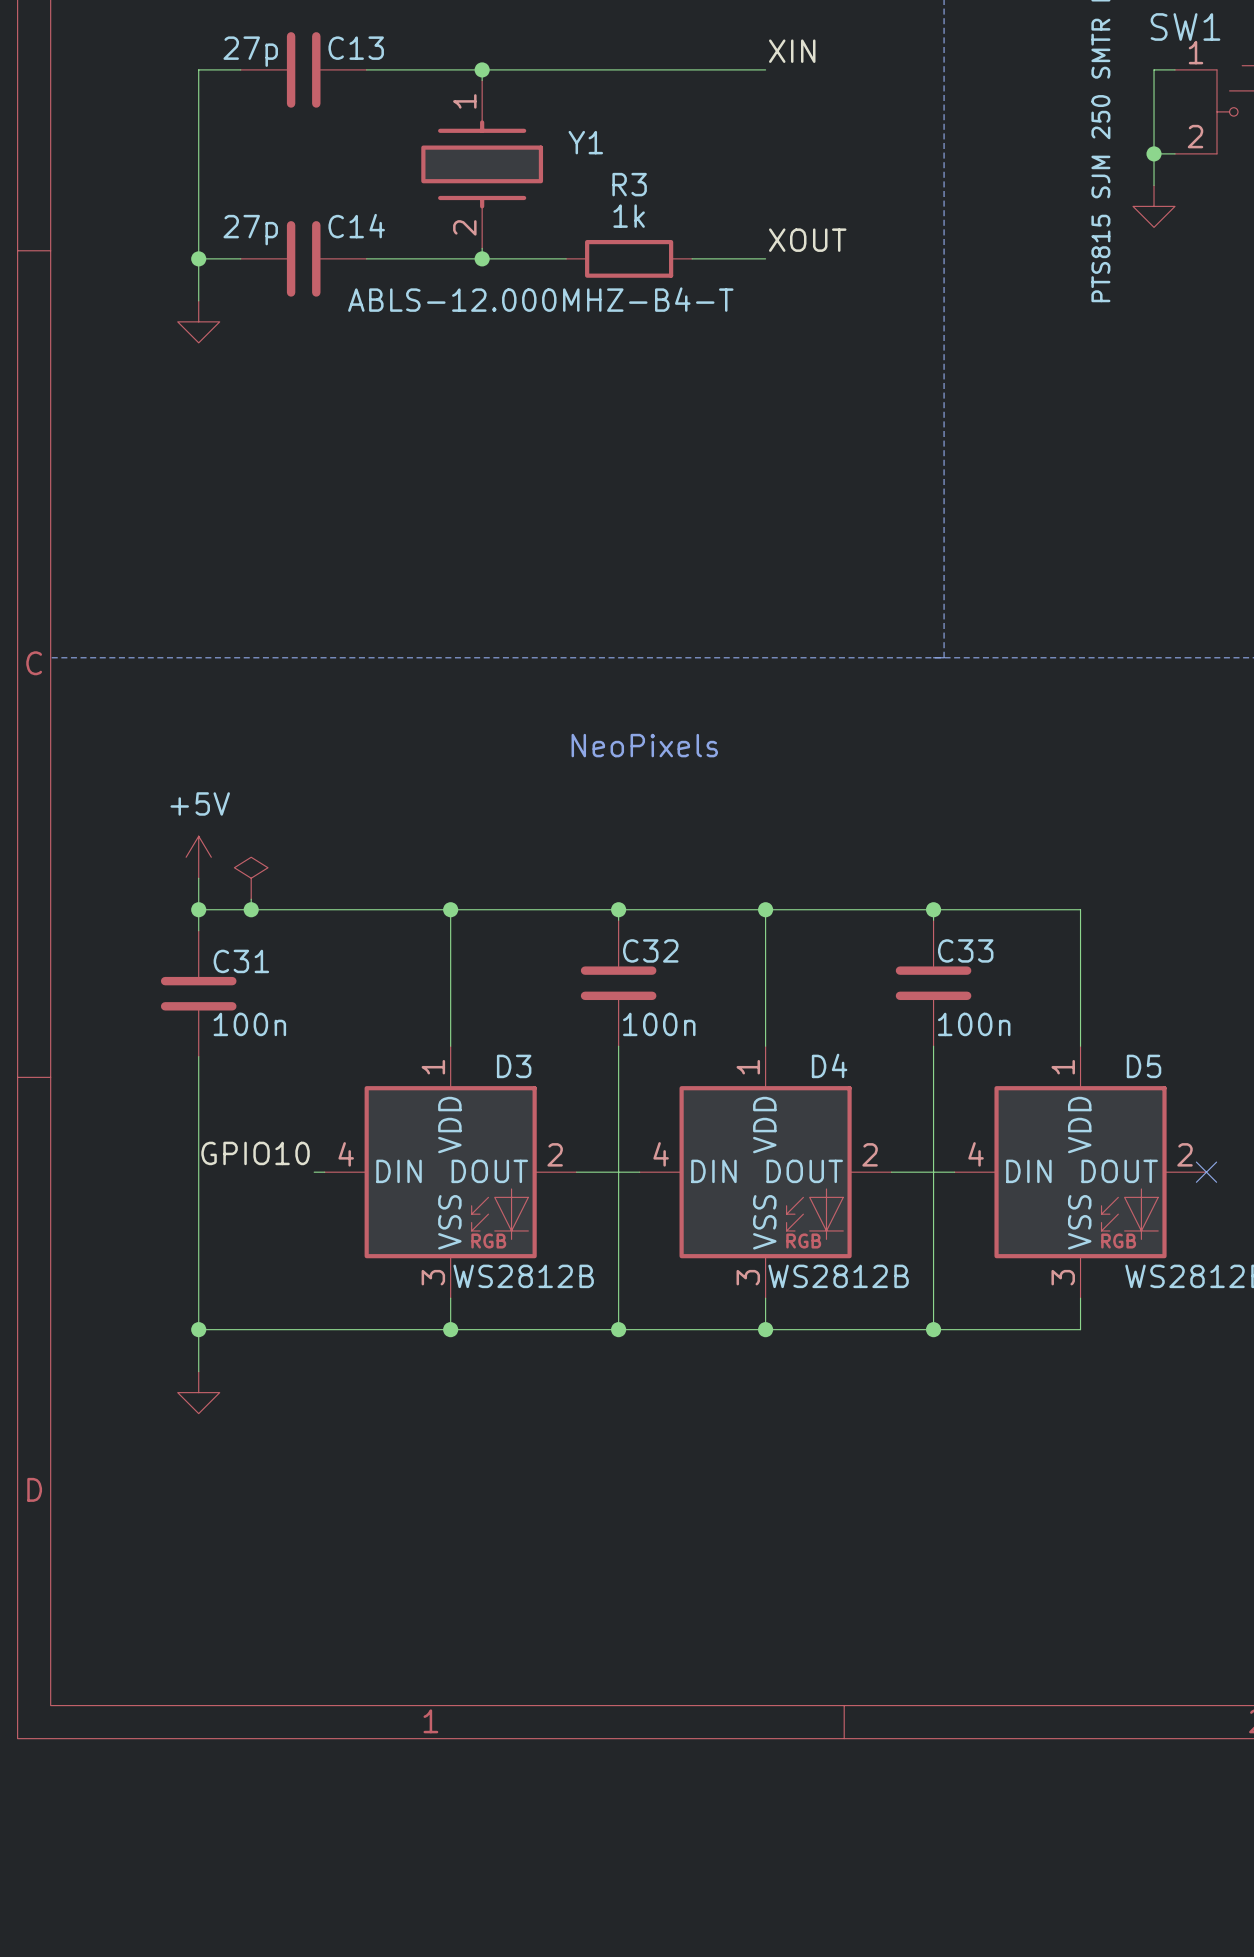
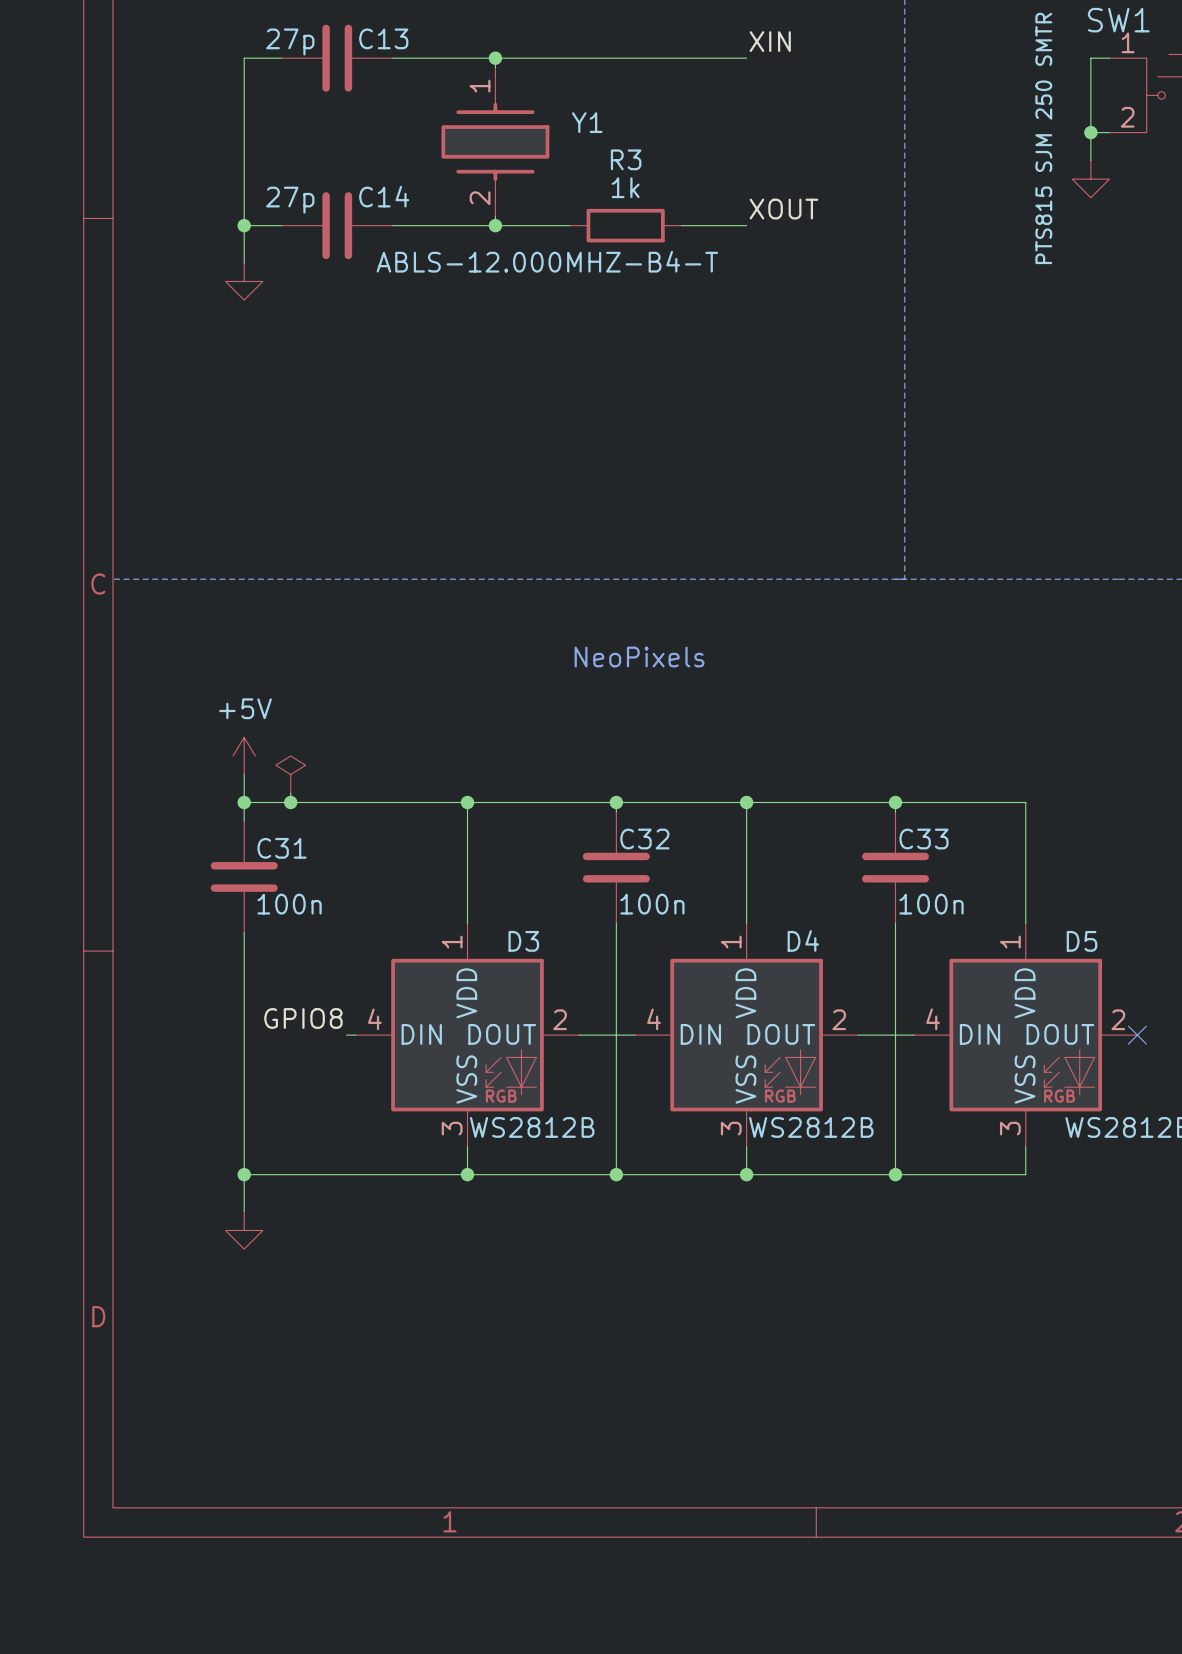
label: GPIO10 (255, 1153) -> GPIO8 (303, 1018)

